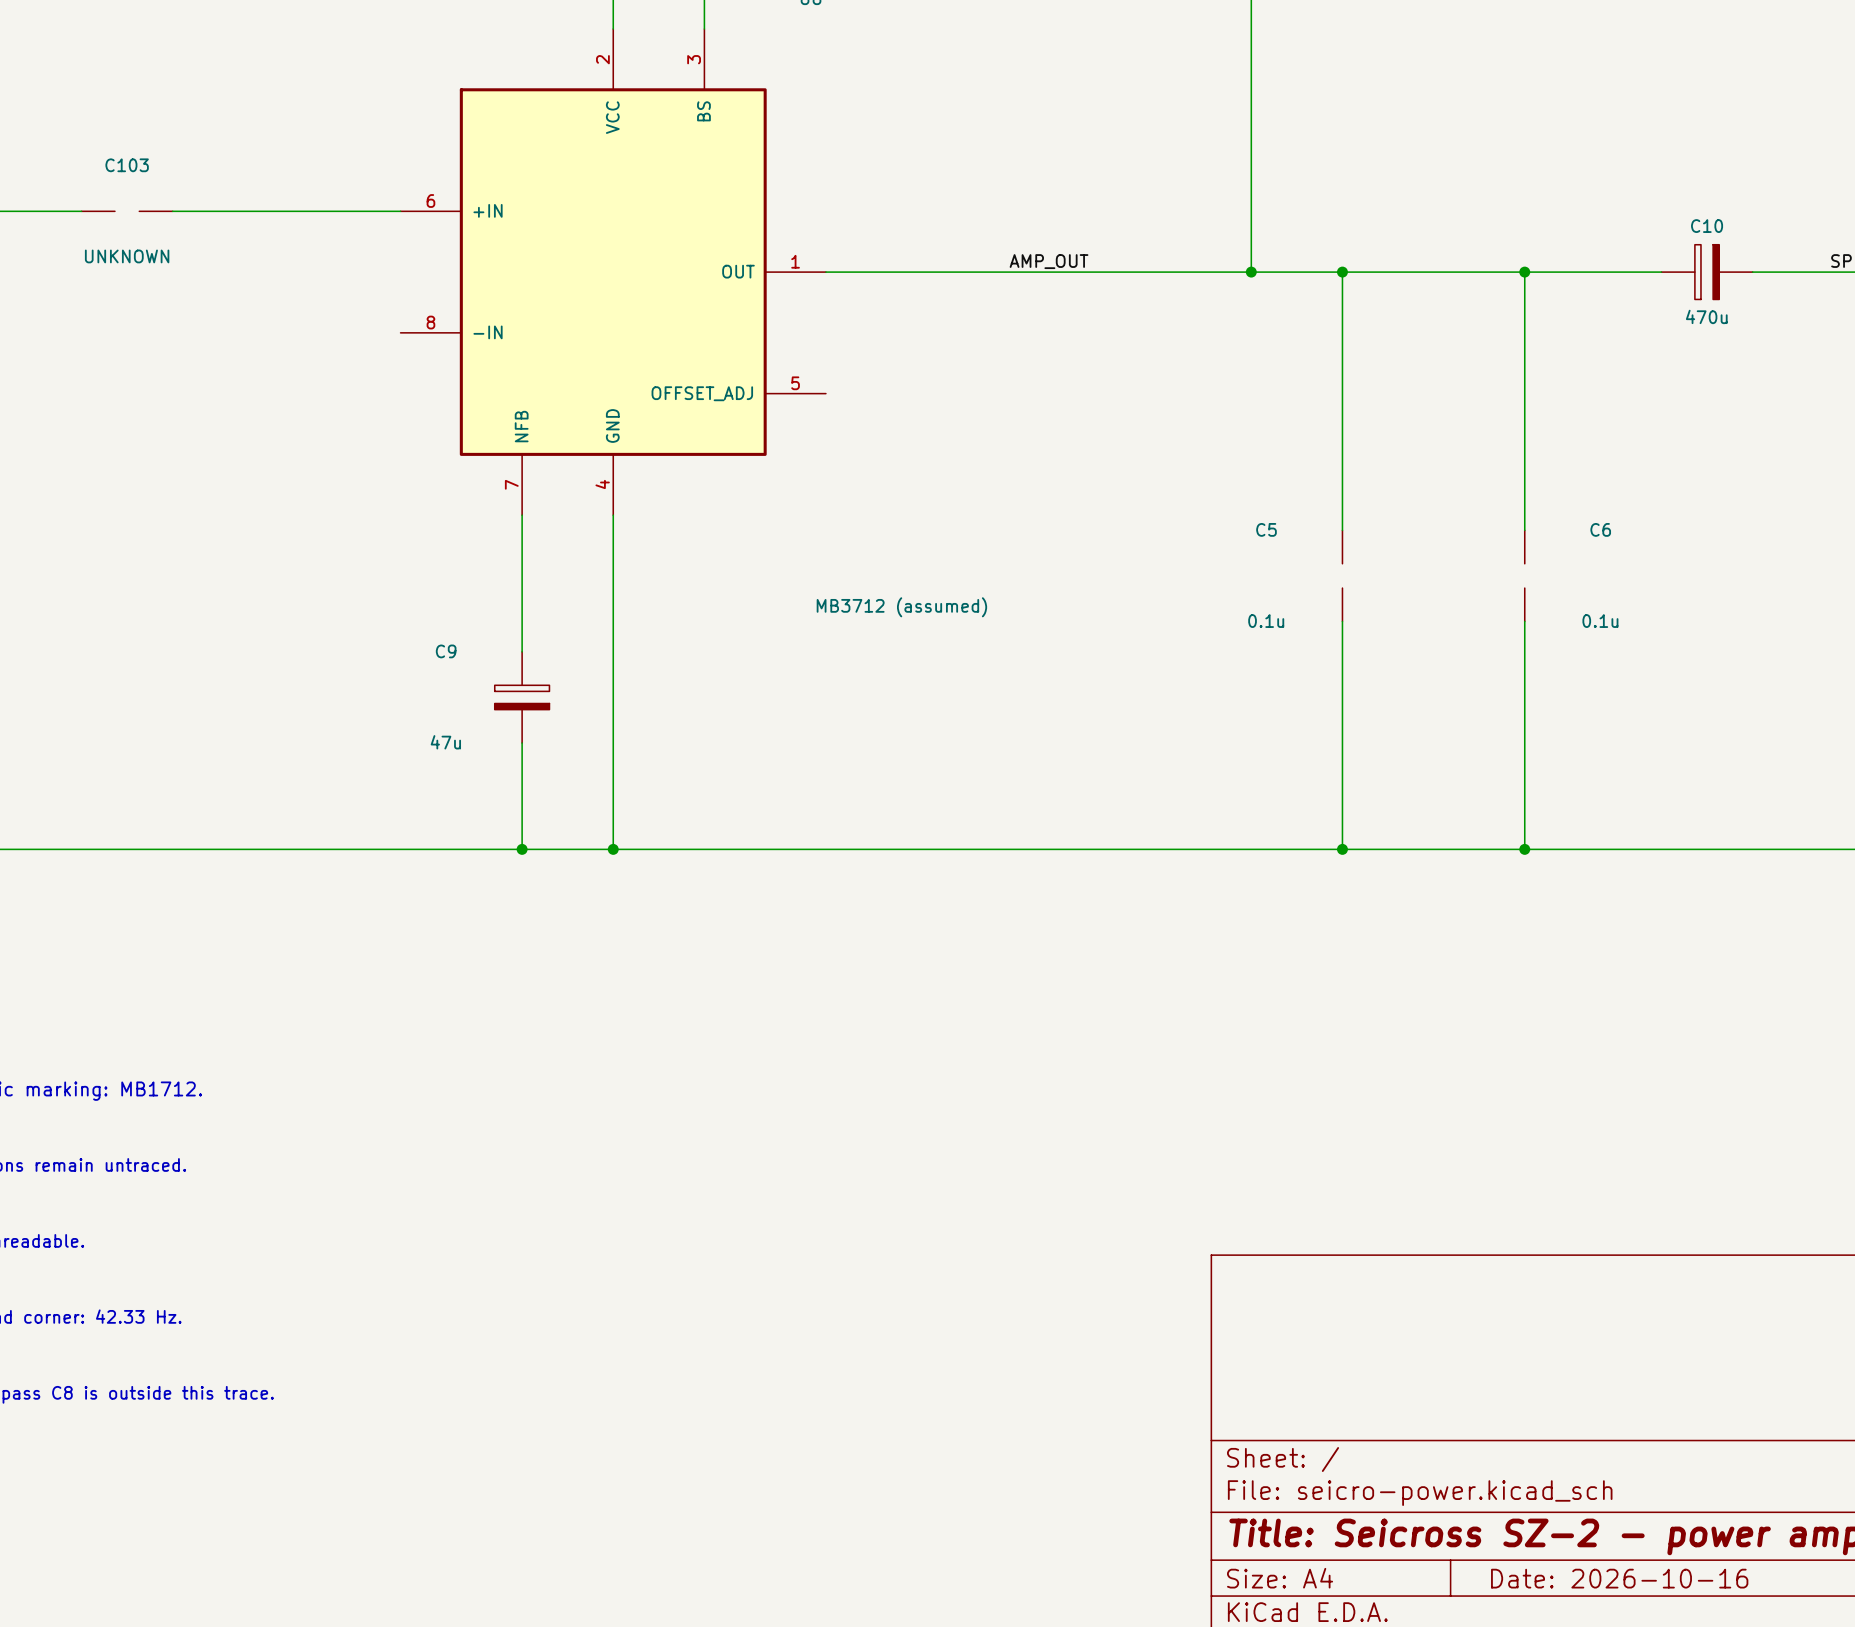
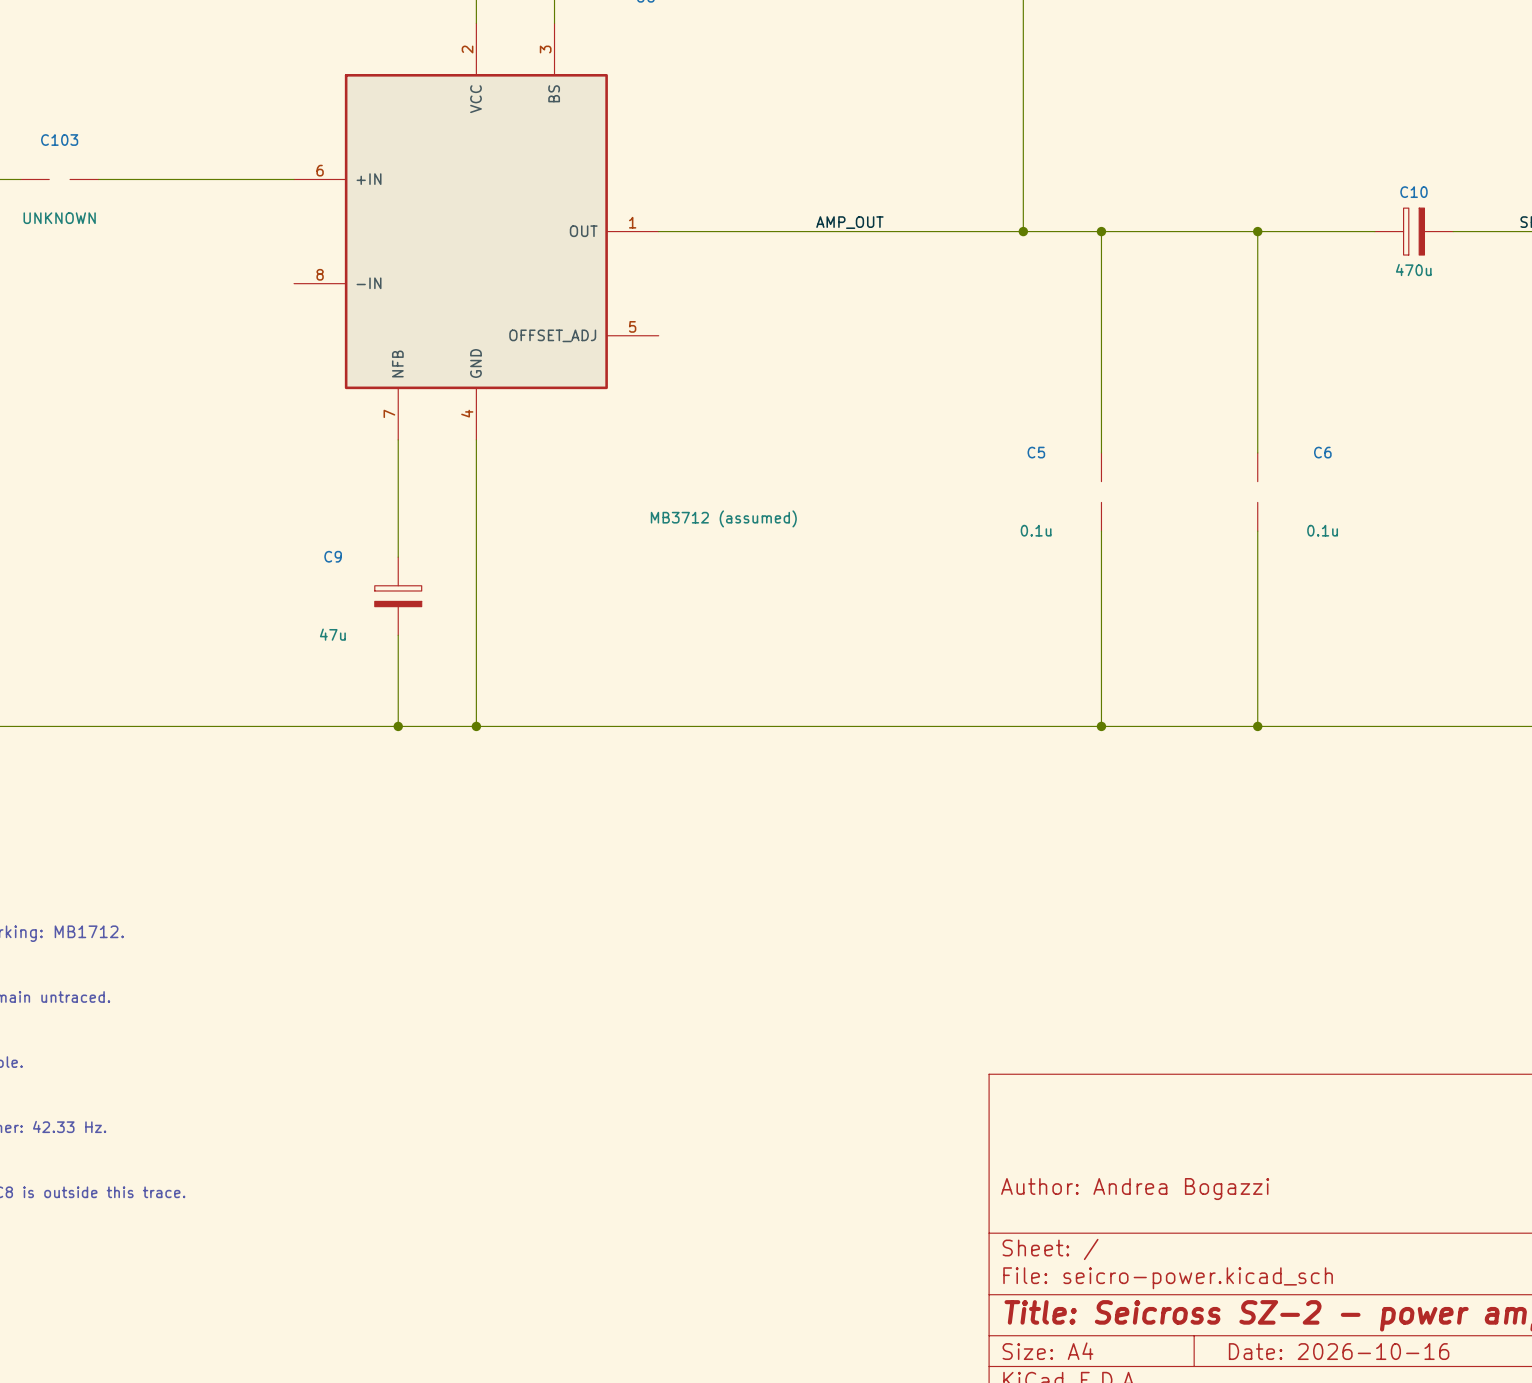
title block: none -> Author: Andrea Bogazzi (1135, 1189)

